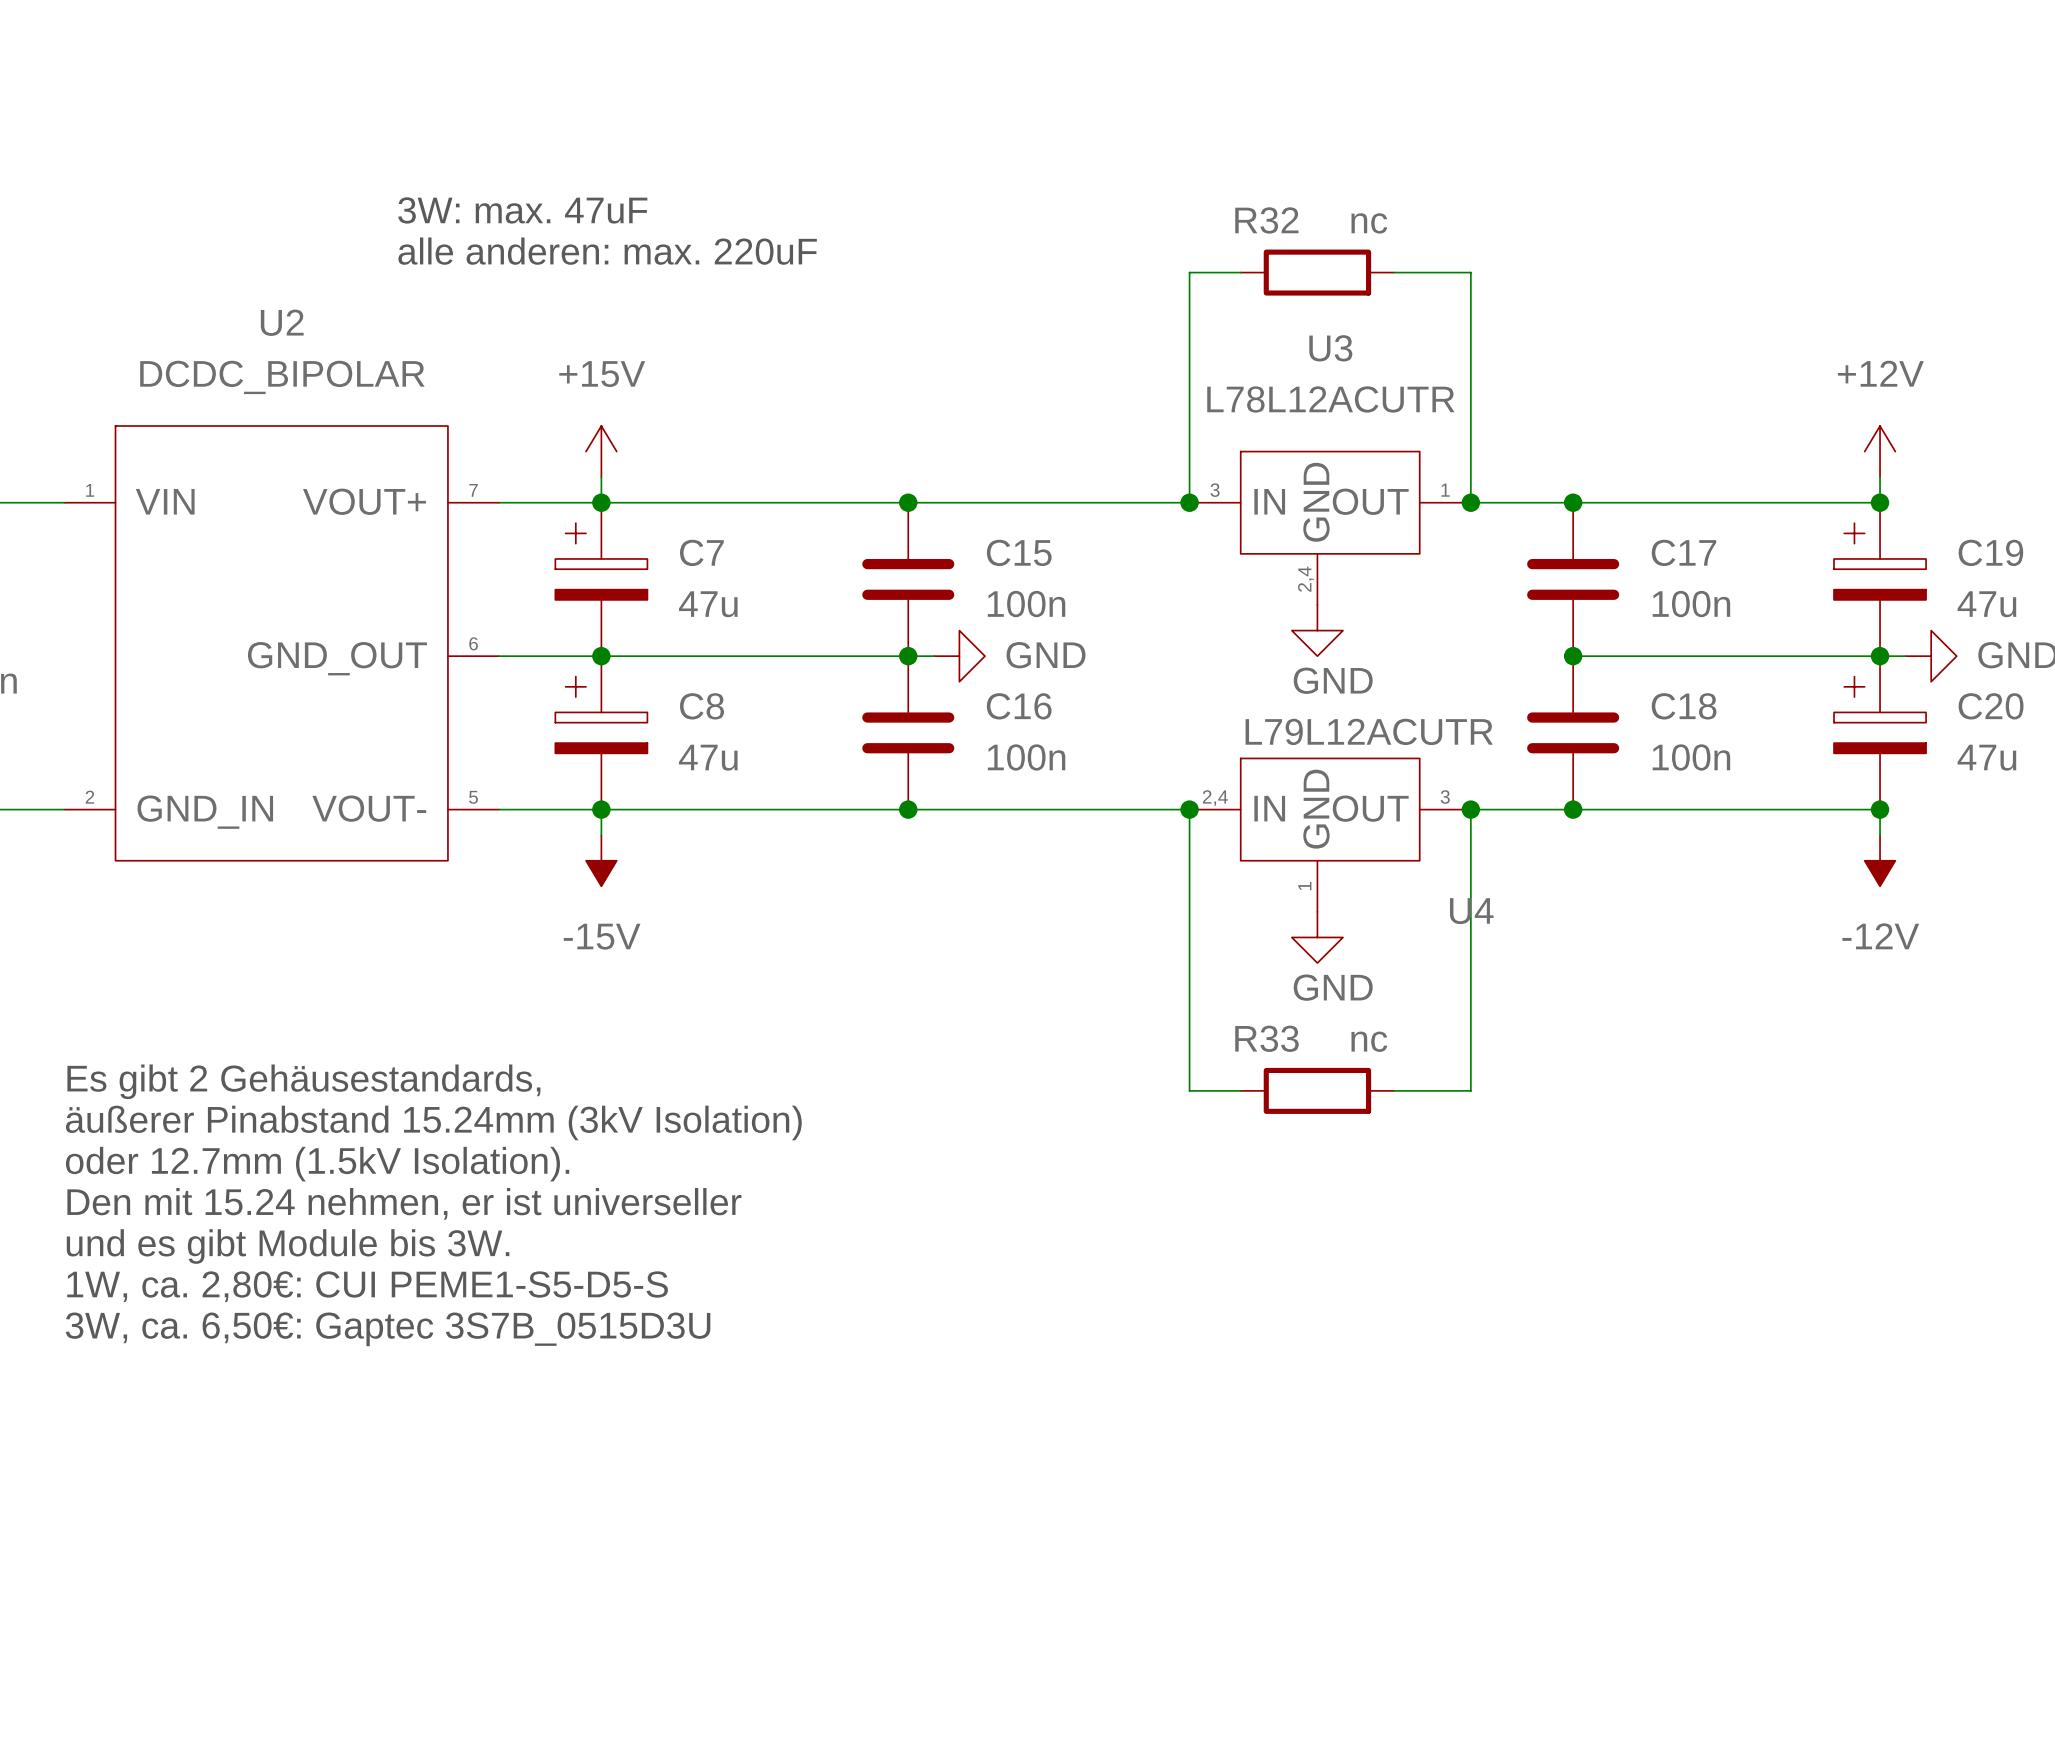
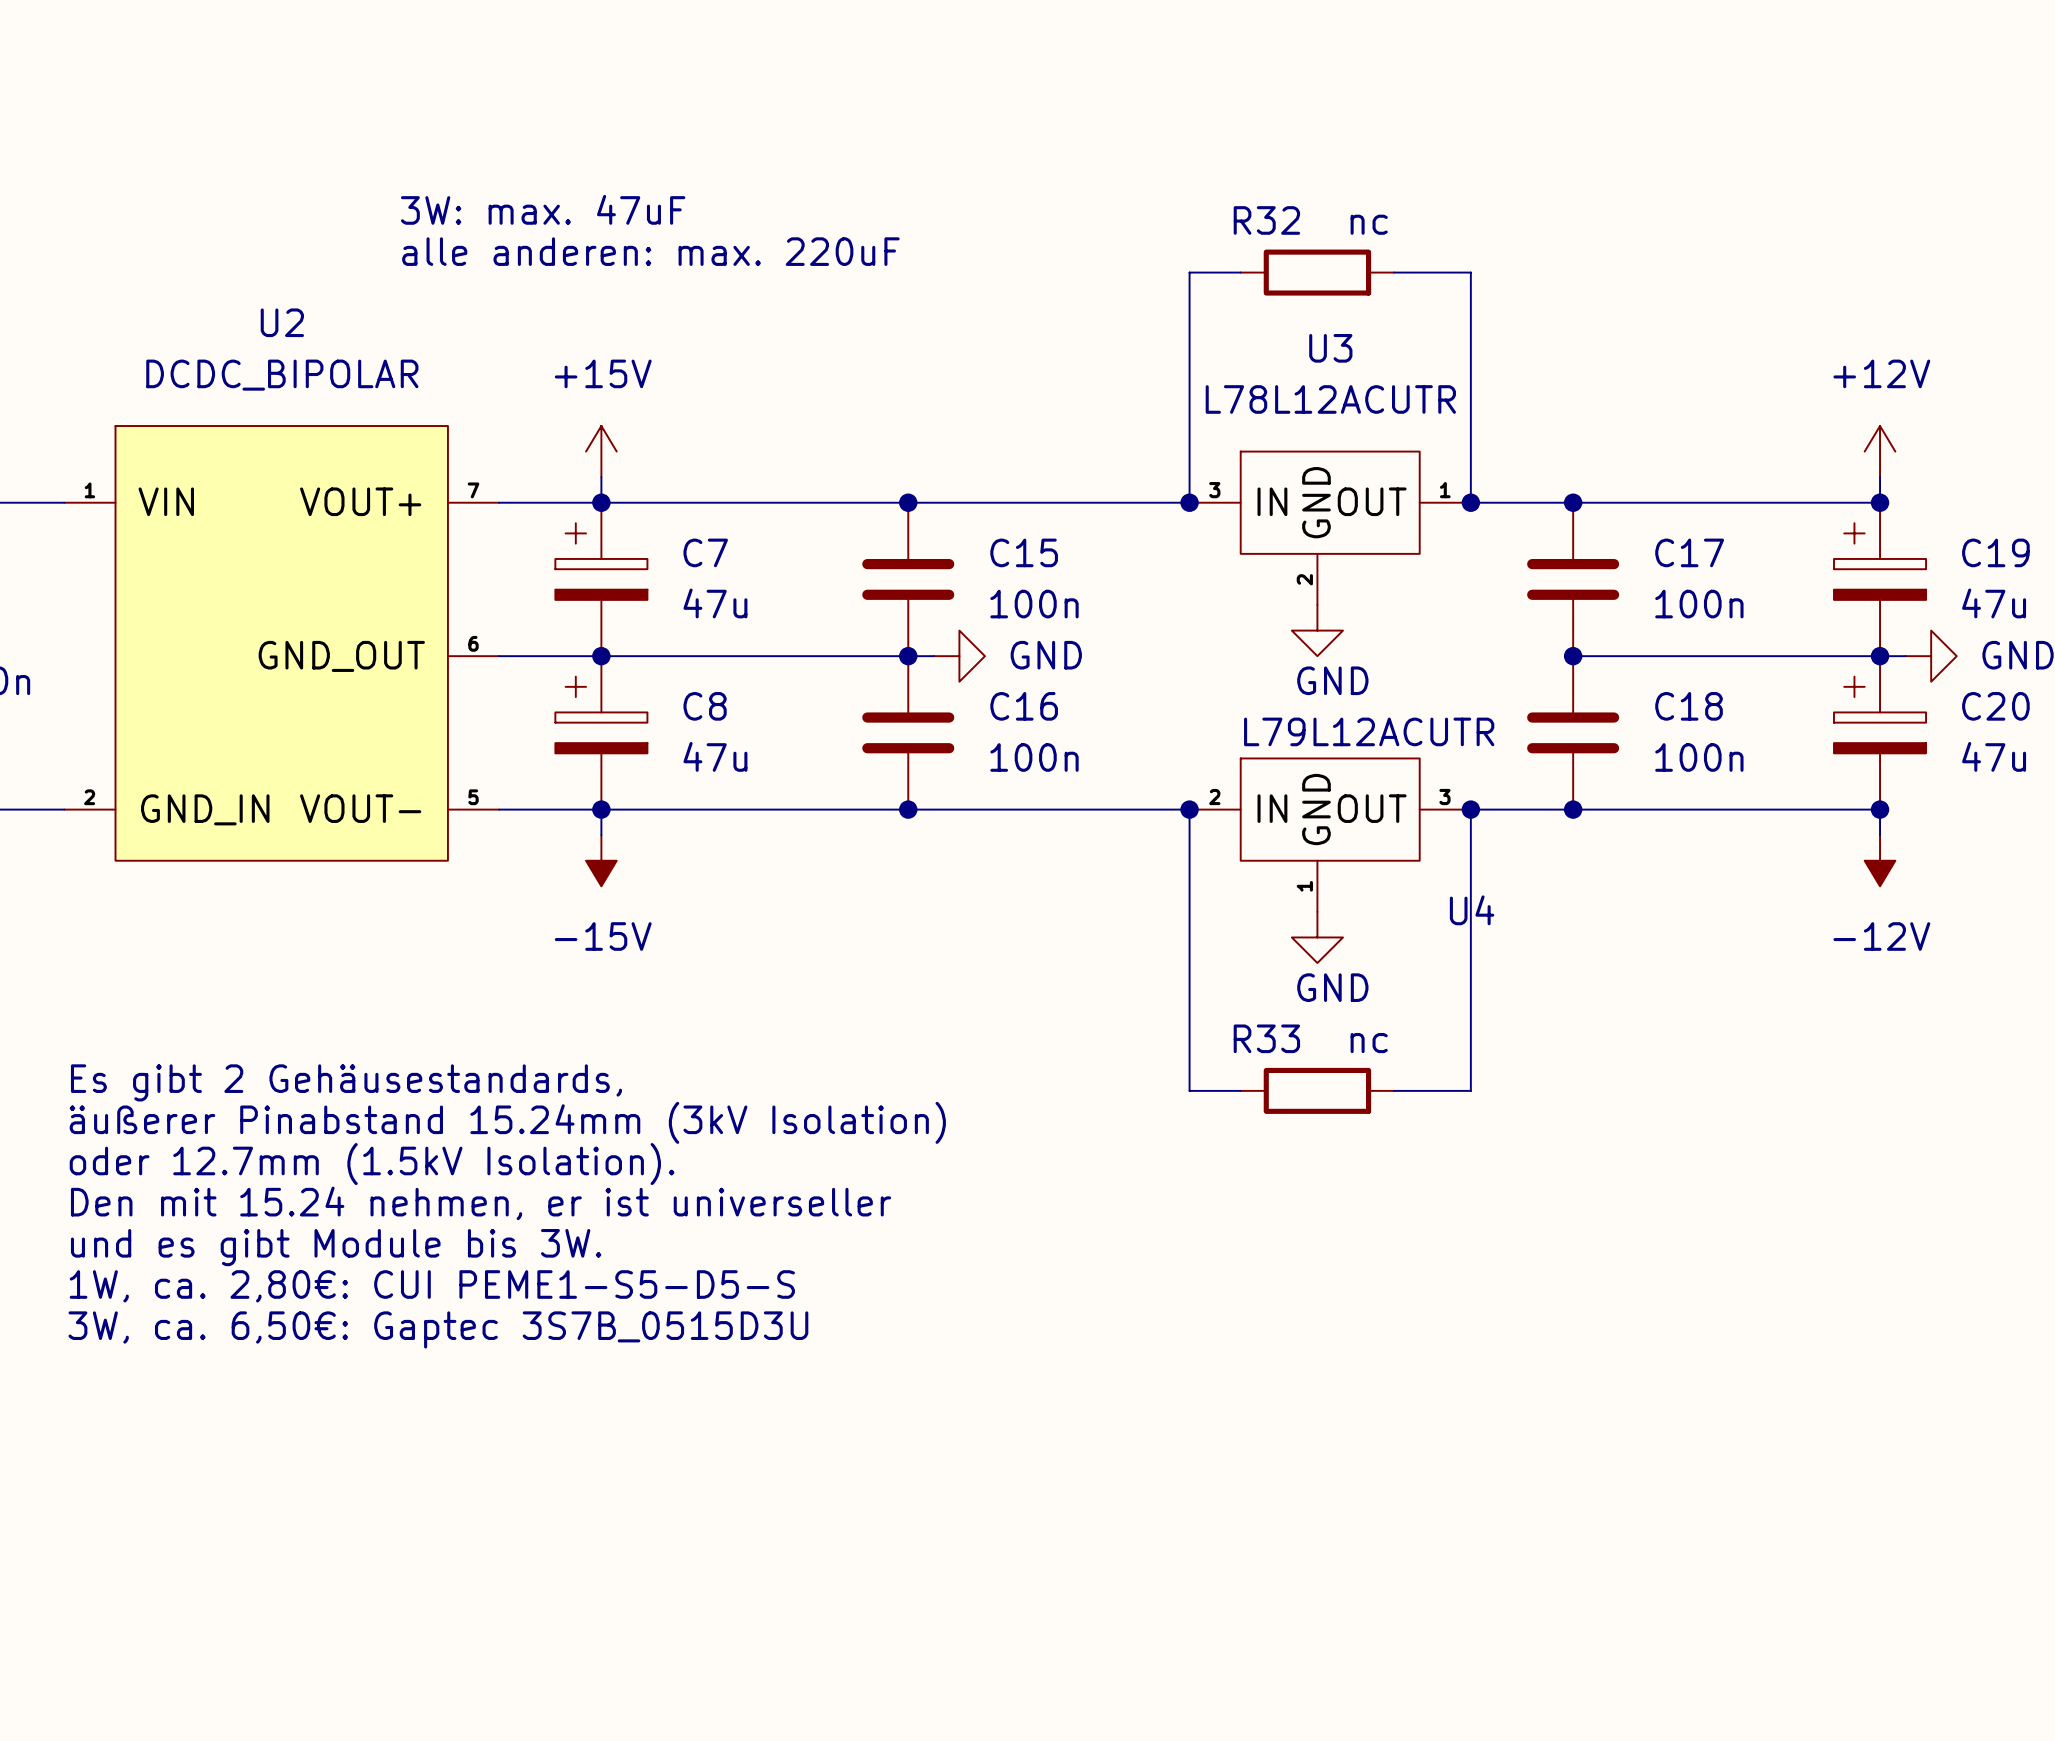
U3 pin number: 2,4 (1305, 579) -> 2 (1304, 579)
U4 pin number: 2,4 (1215, 798) -> 2 (1214, 797)

